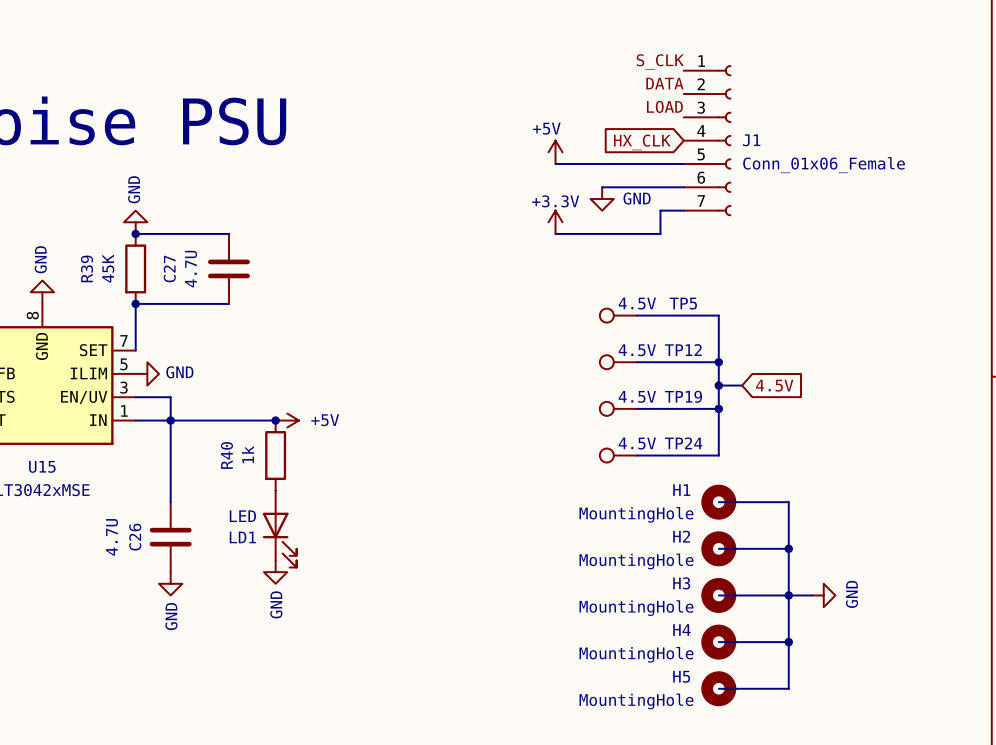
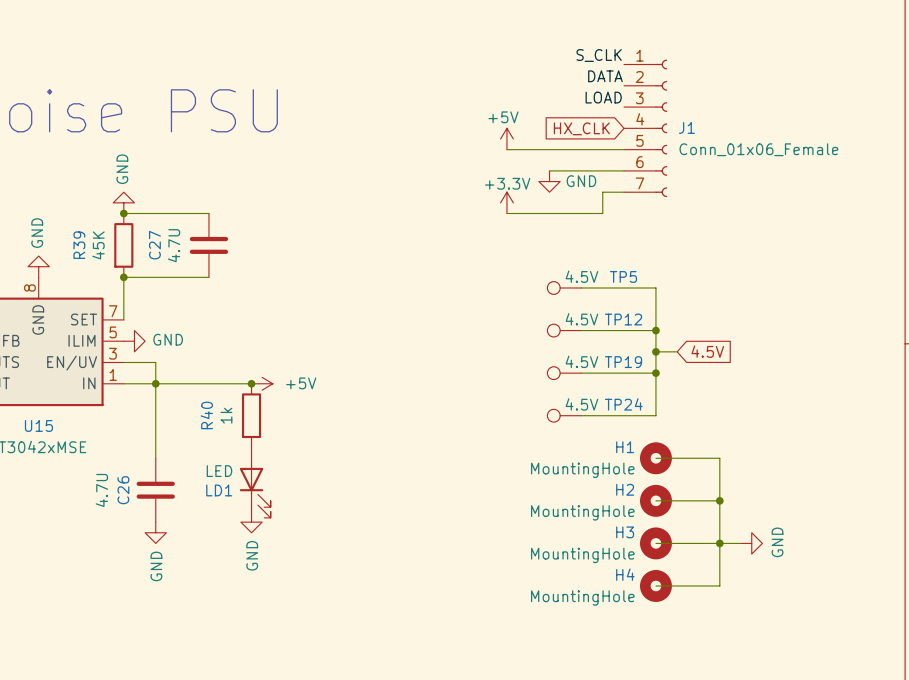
wire: (788, 642) (788, 688) (718, 688) -> none
junction: (788, 642) -> none
H5: MountingHole (718, 688) -> none

